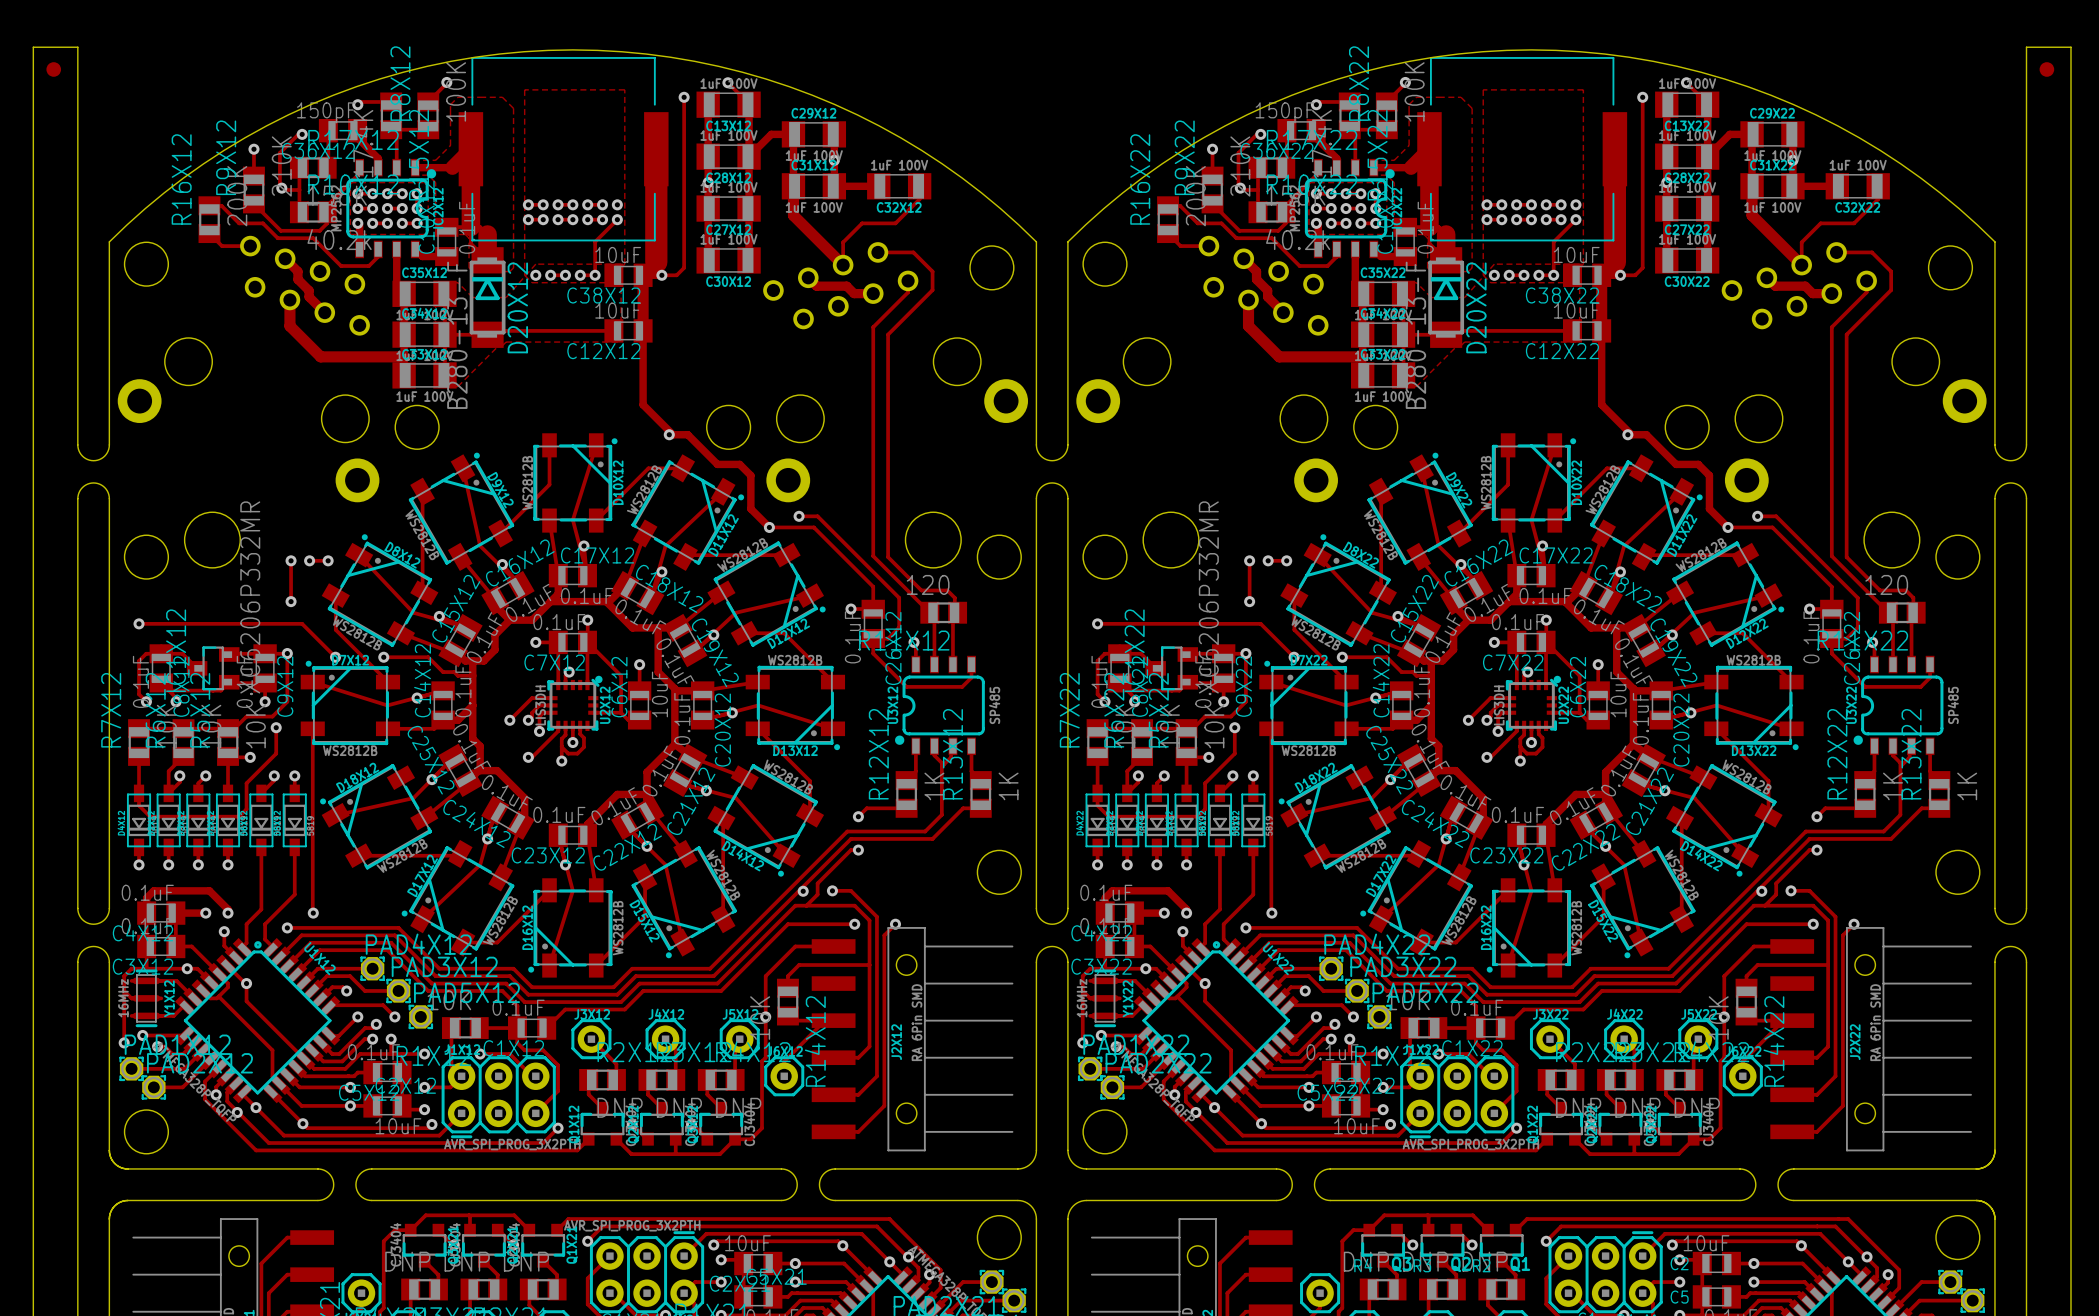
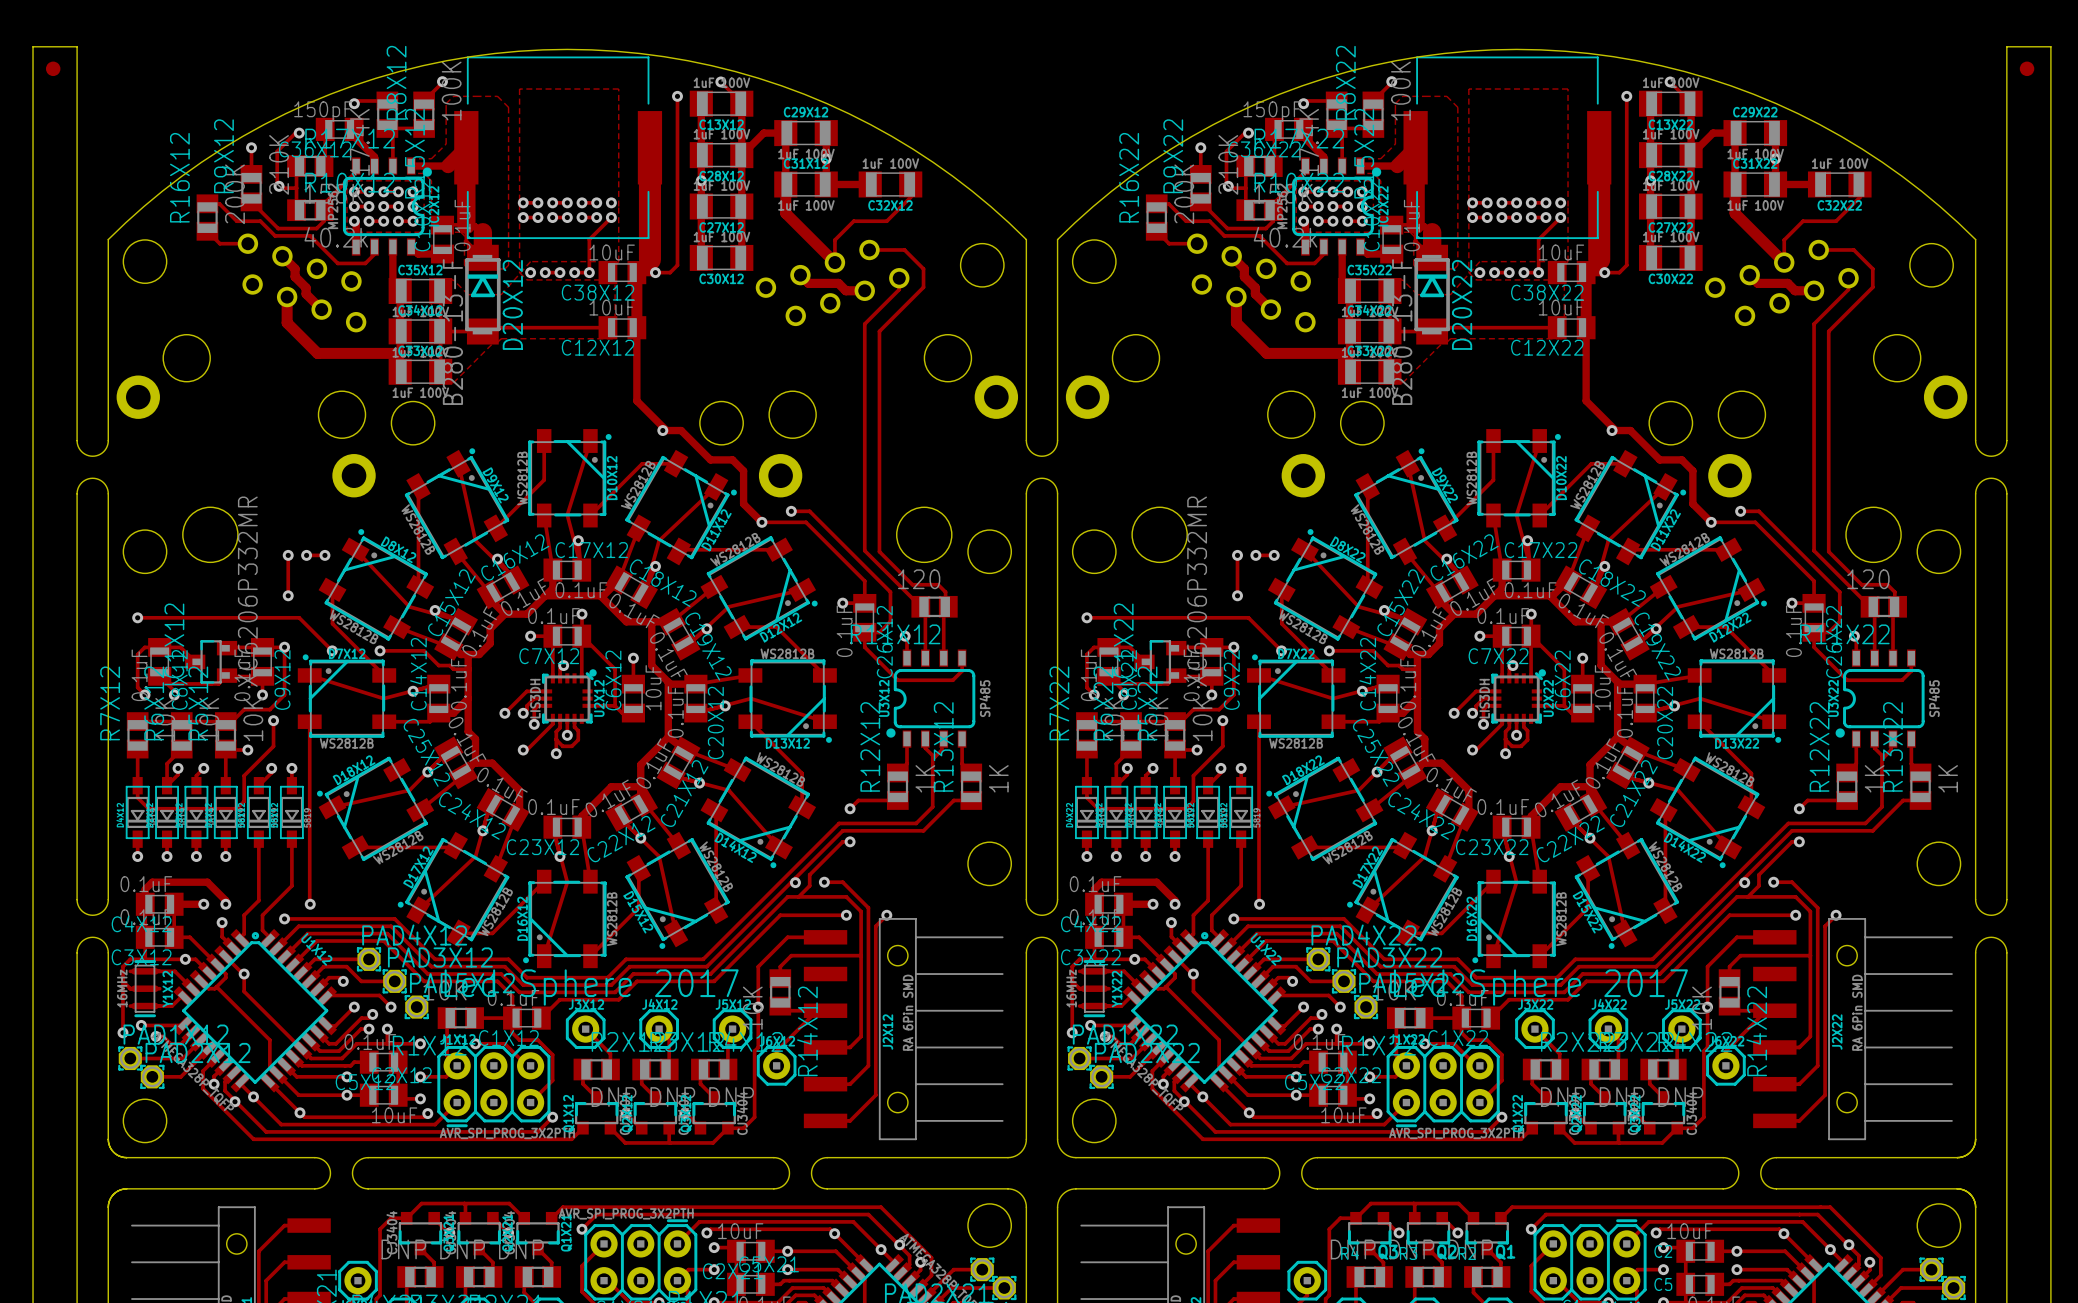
text: none -> Led Sphere 2017 (591, 987)
text: none -> Led Sphere 2017 (1540, 987)

